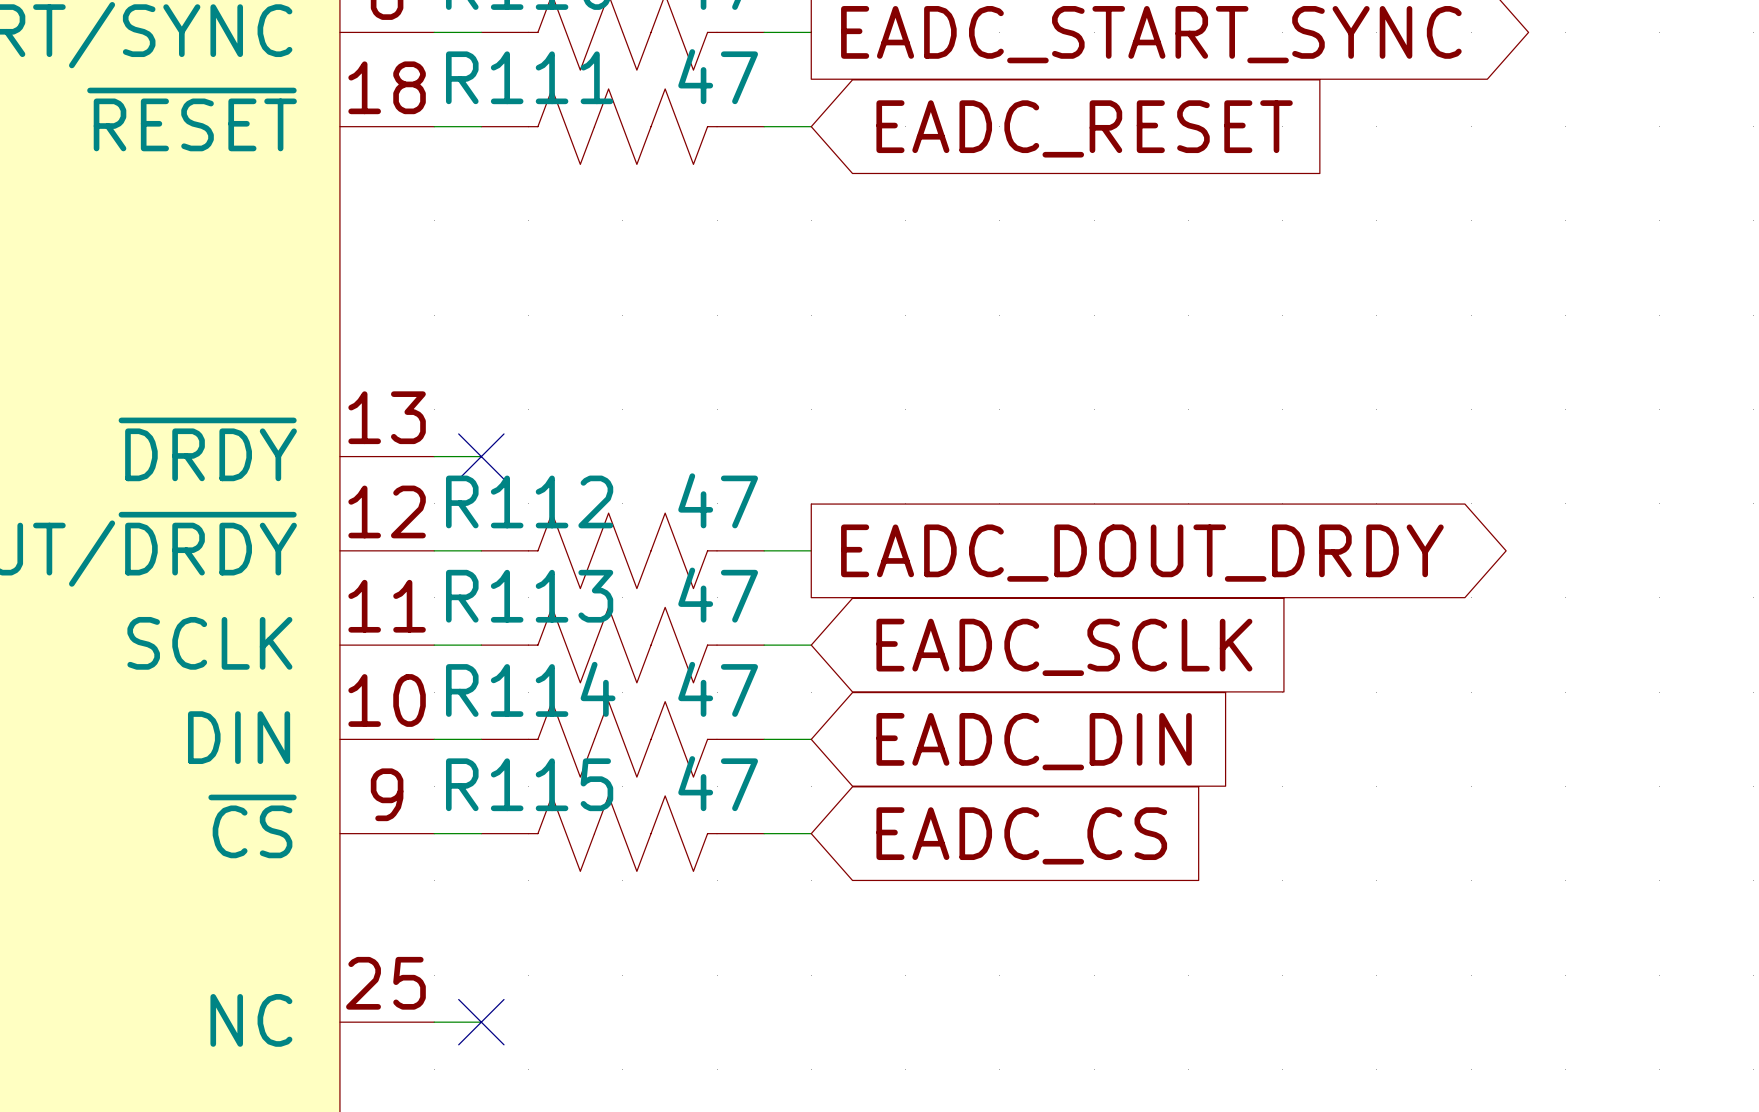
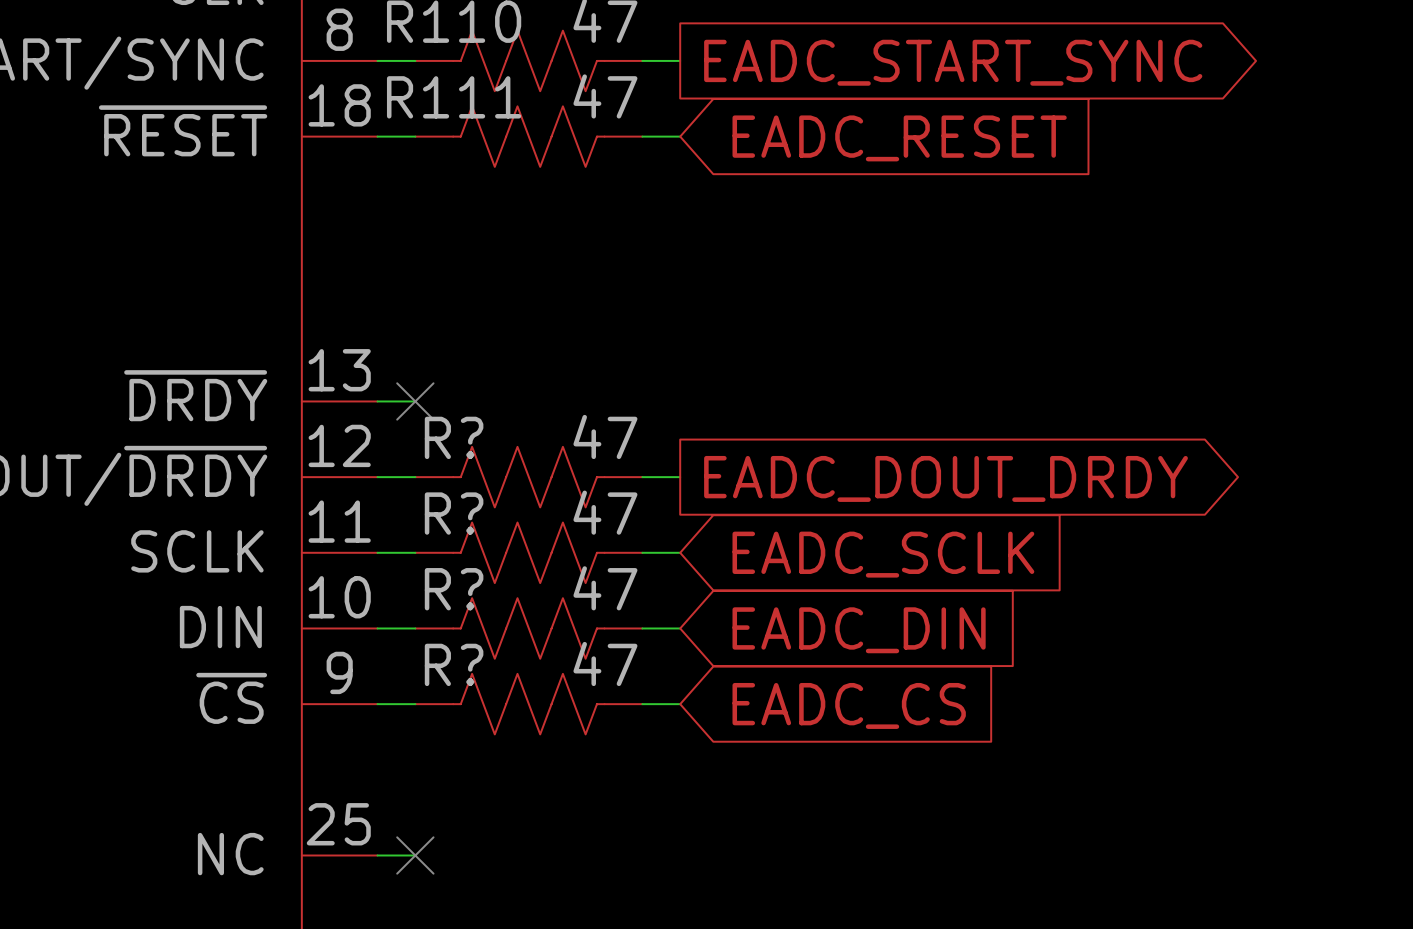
R112 name: R112 (529, 501) -> R? (454, 437)
R113 name: R113 (529, 596) -> R? (454, 513)
R114 name: R114 (530, 689) -> R? (454, 589)
R115 name: R115 (529, 784) -> R? (454, 664)

